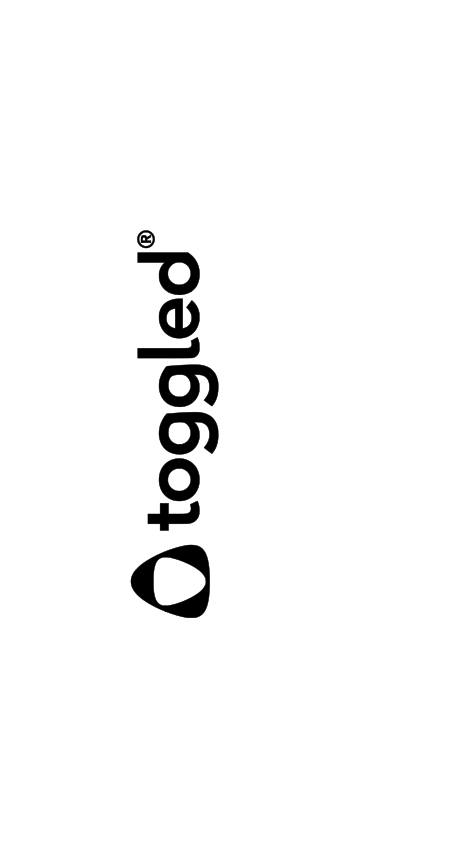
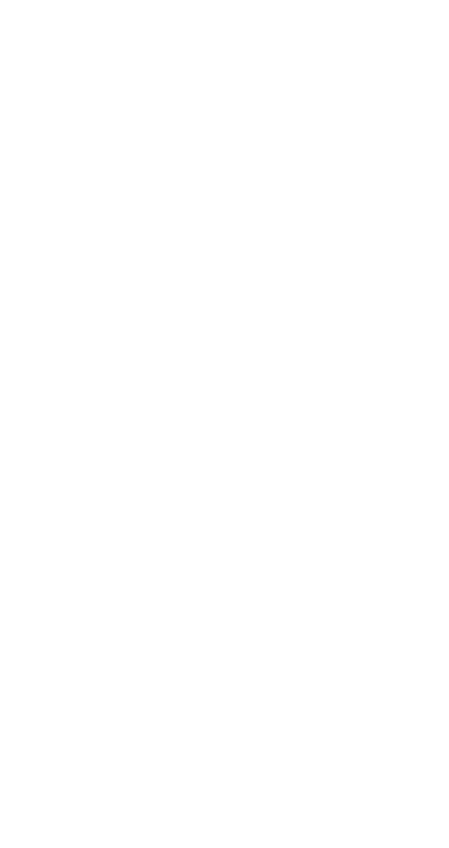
drawing: [130, 230, 219, 618] -> none

